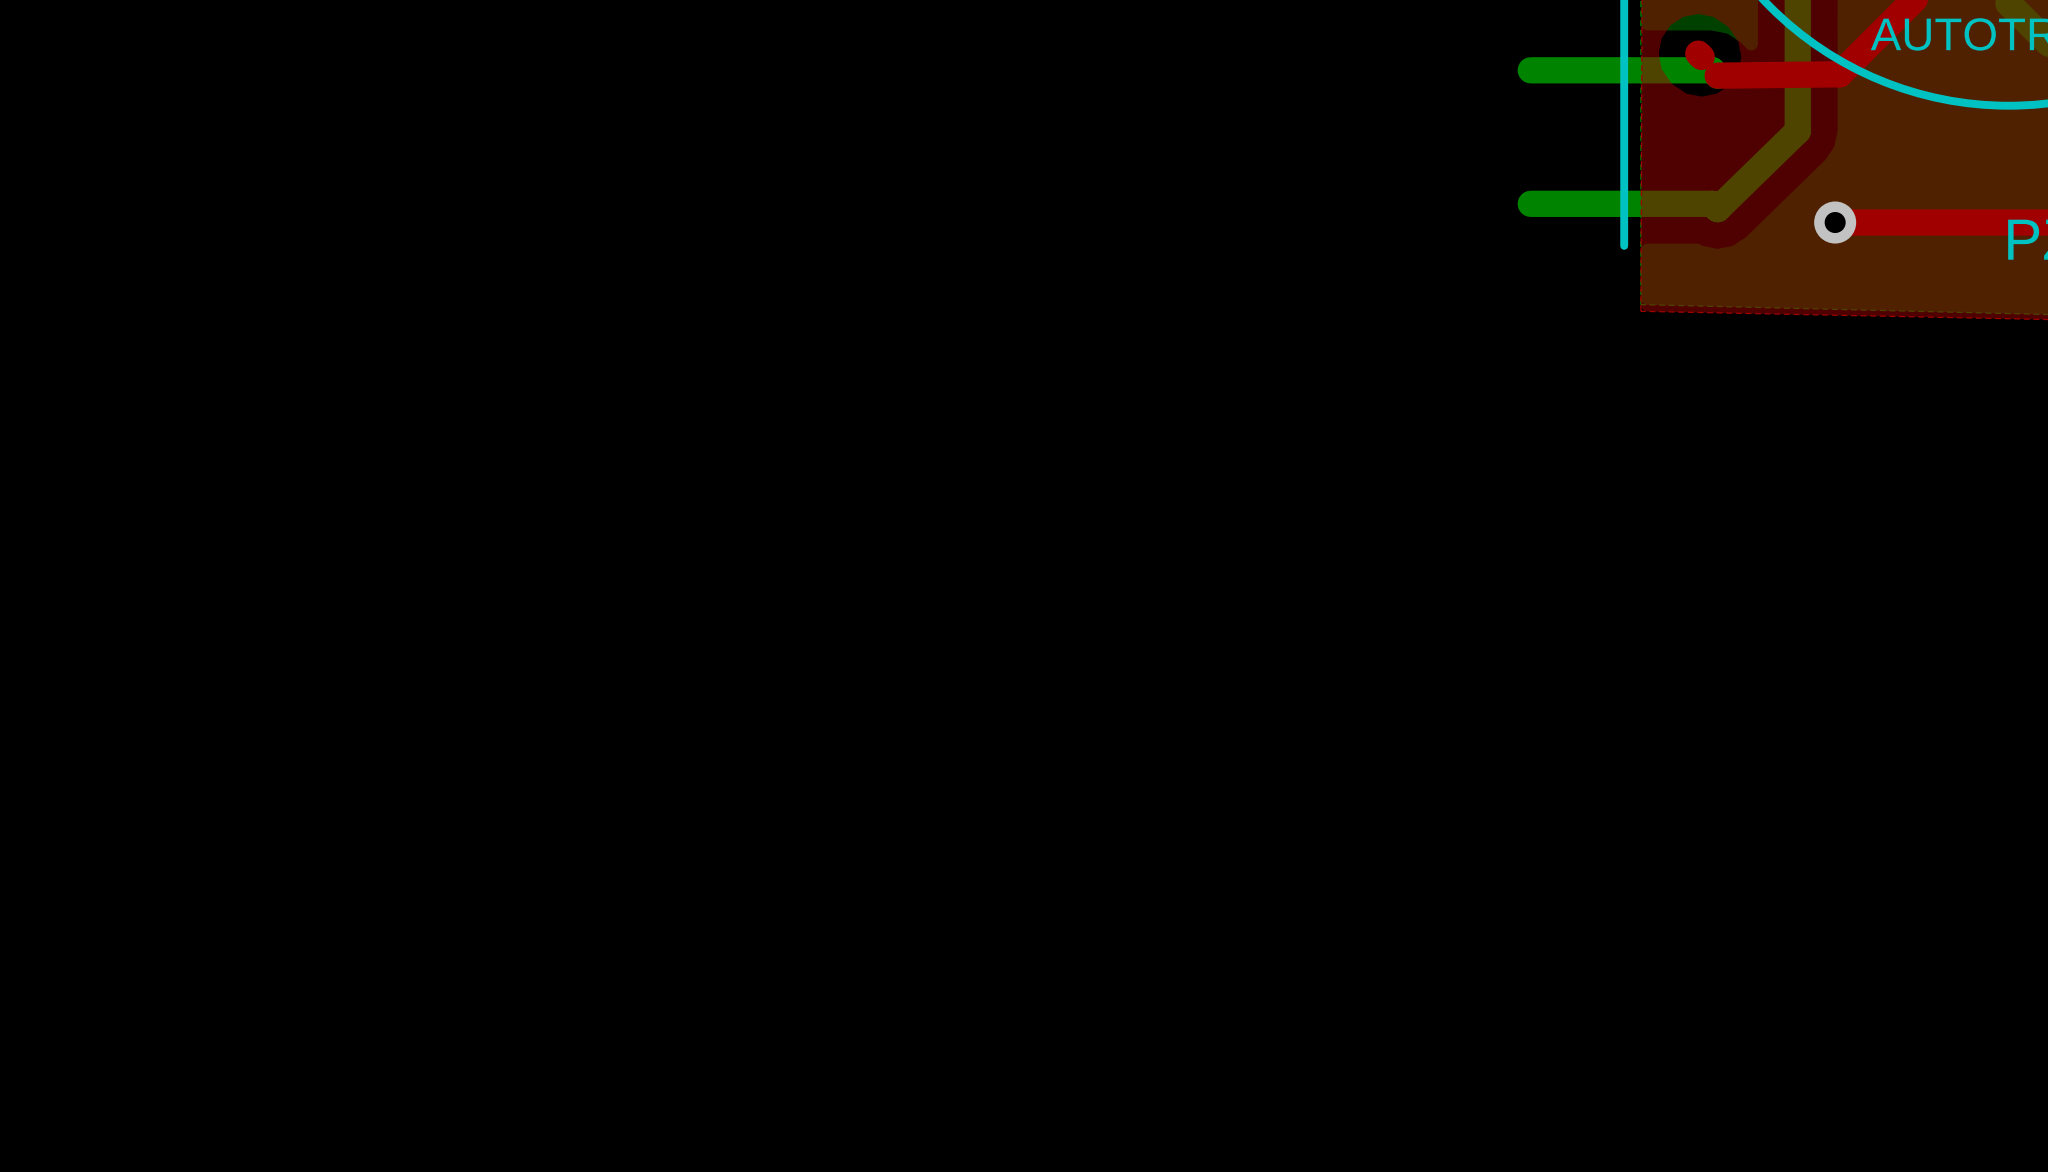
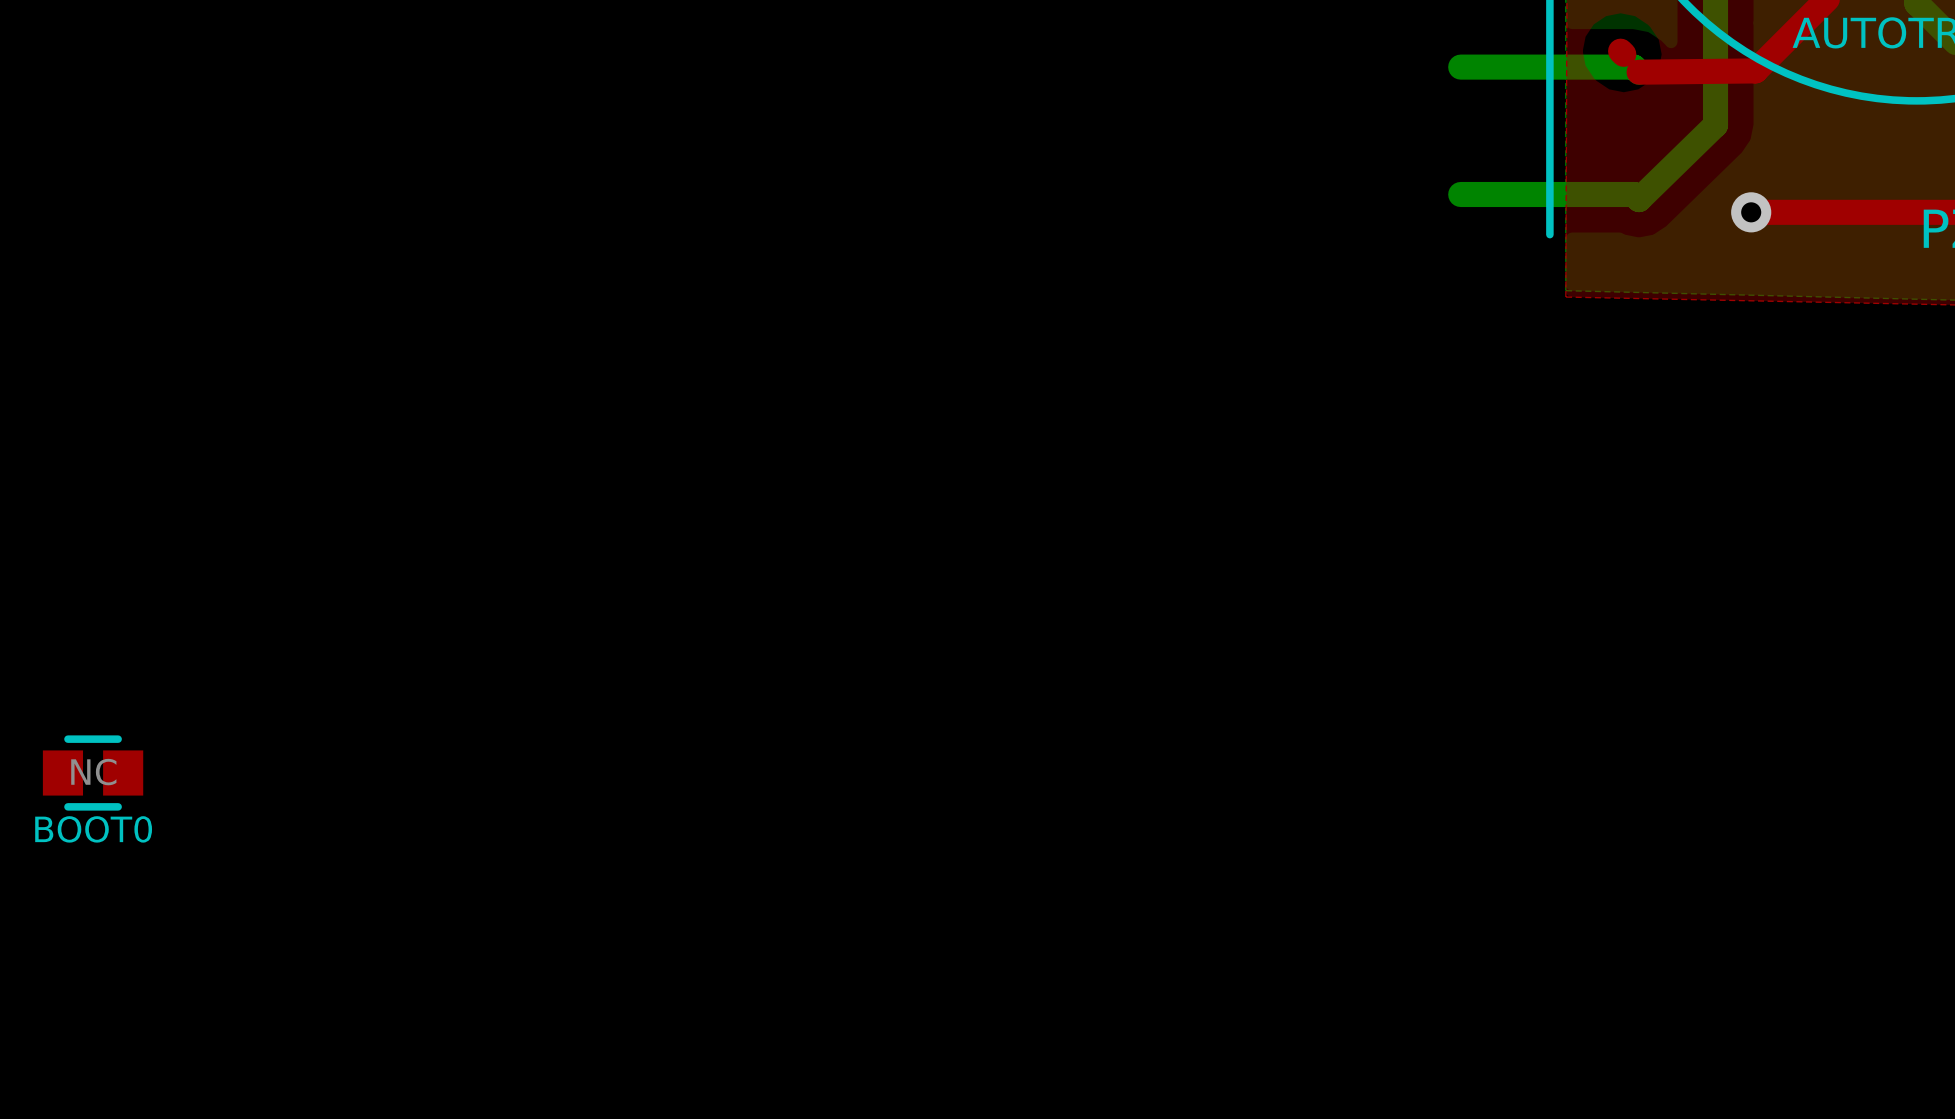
BOOT0: none -> NC (93, 773)

